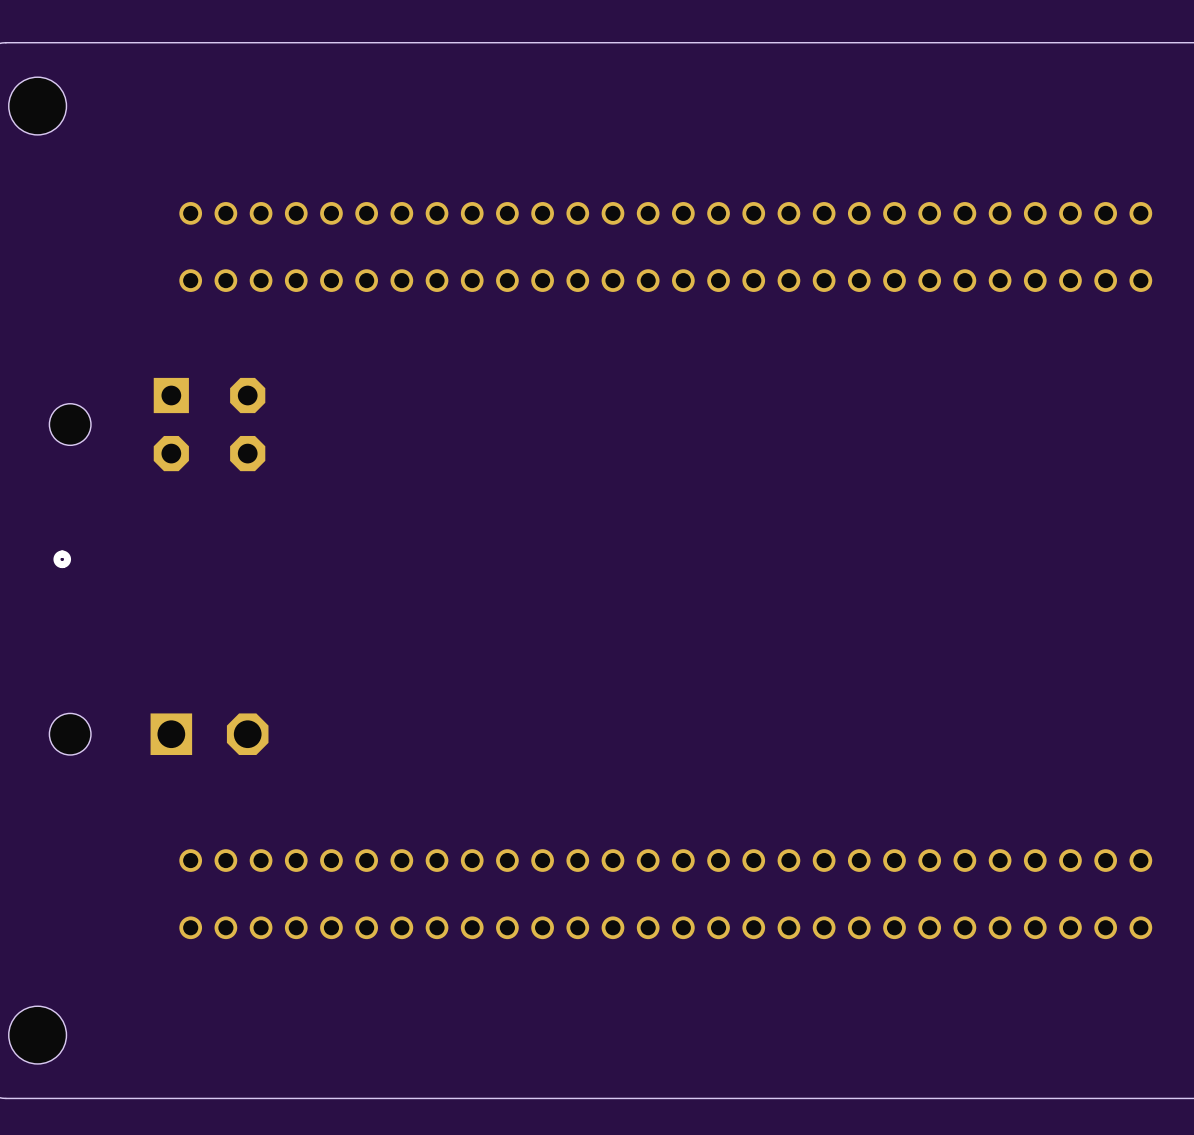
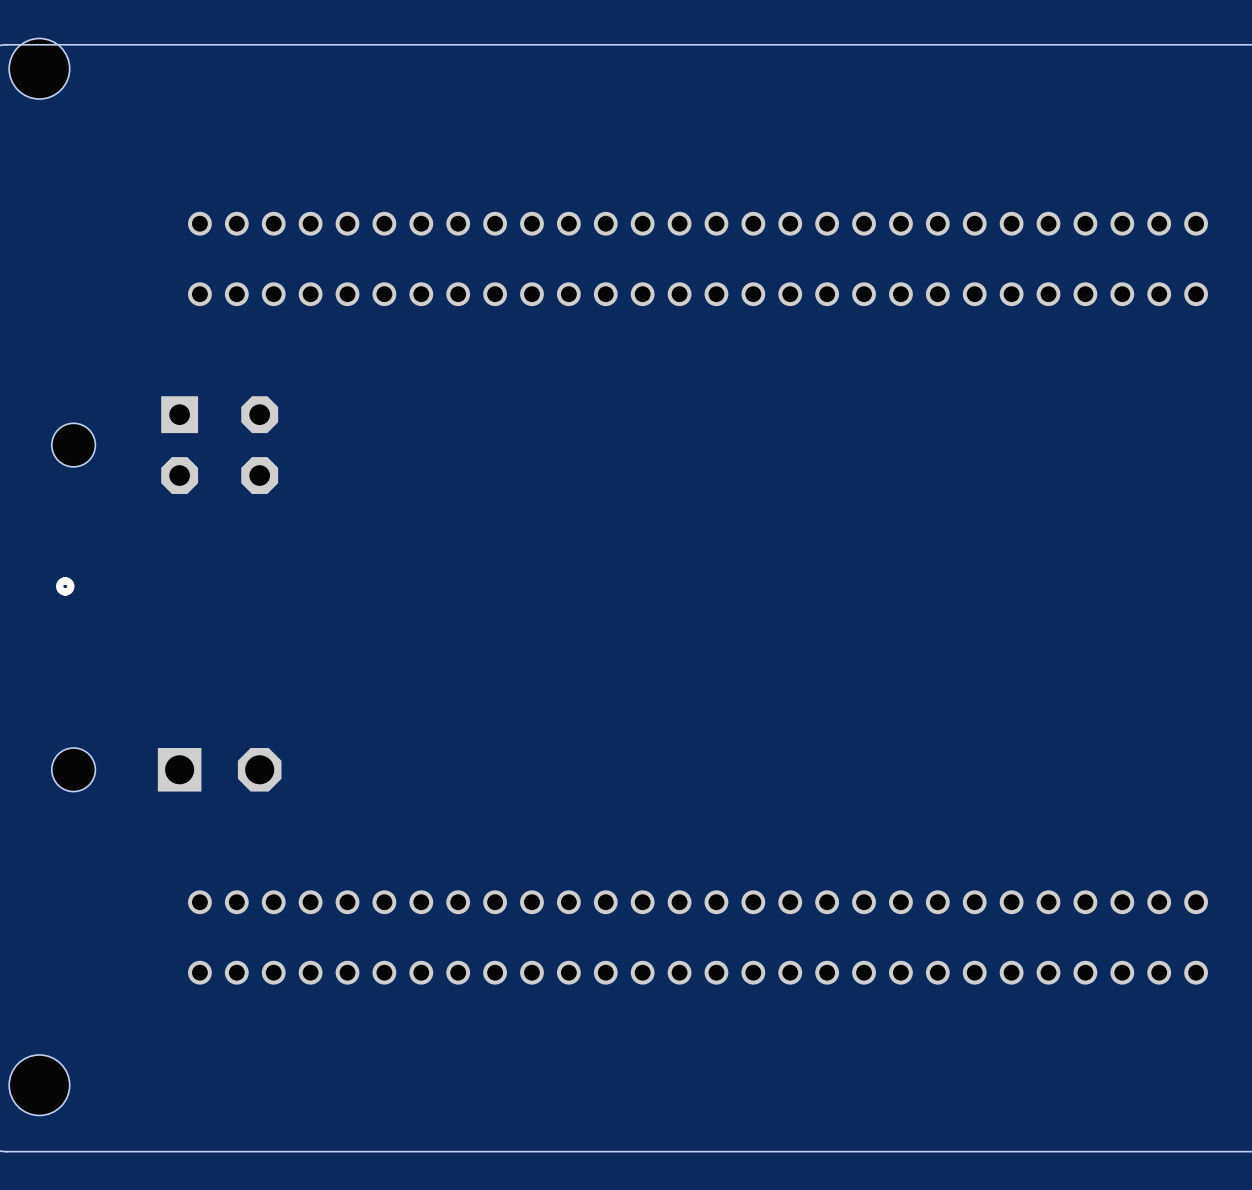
hole position: (37, 106) -> (39, 68)

